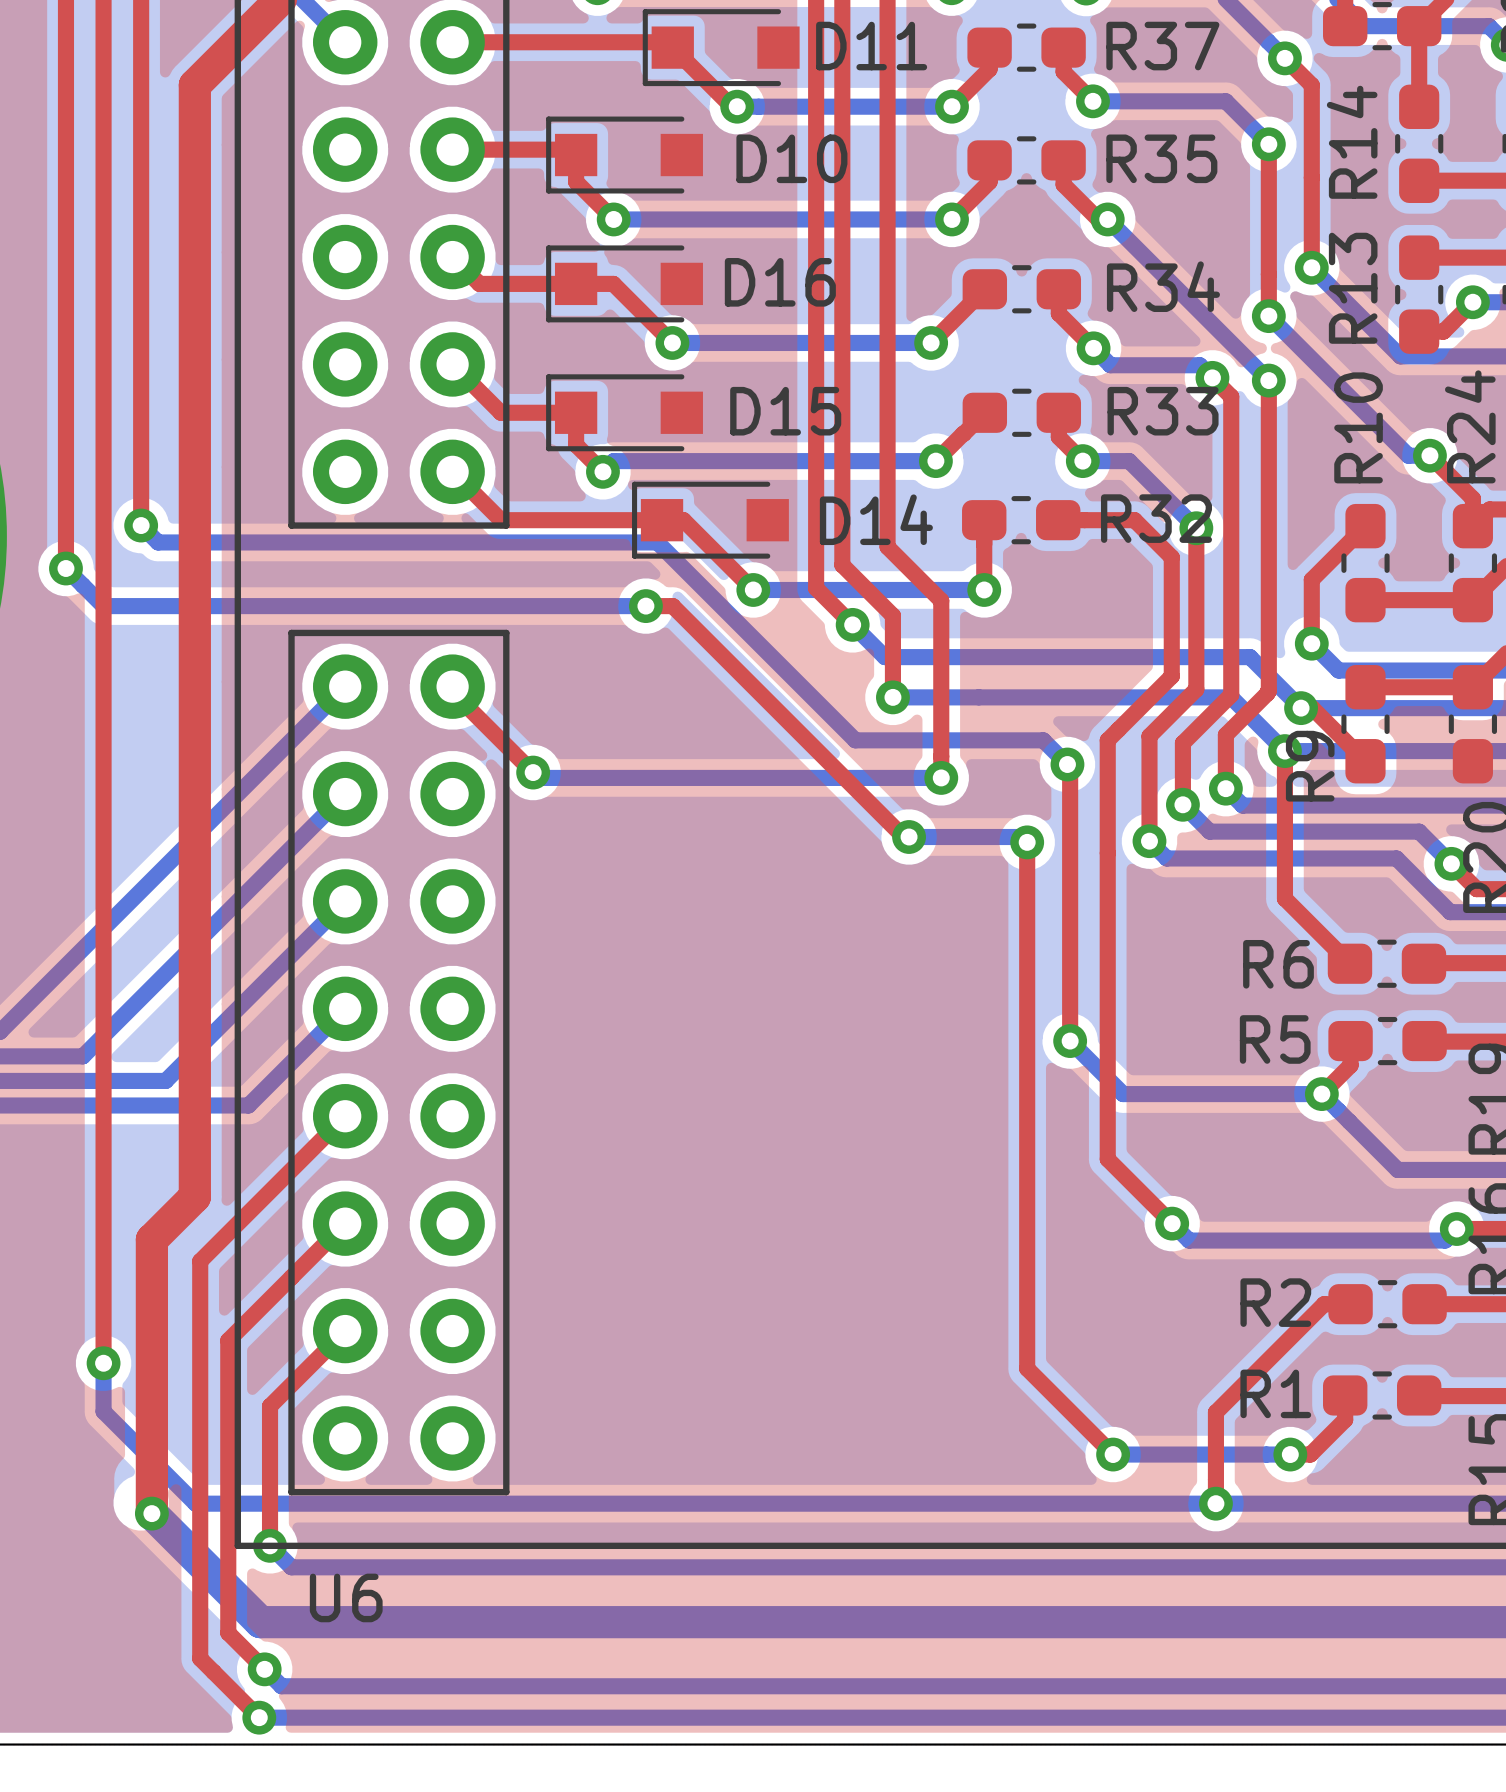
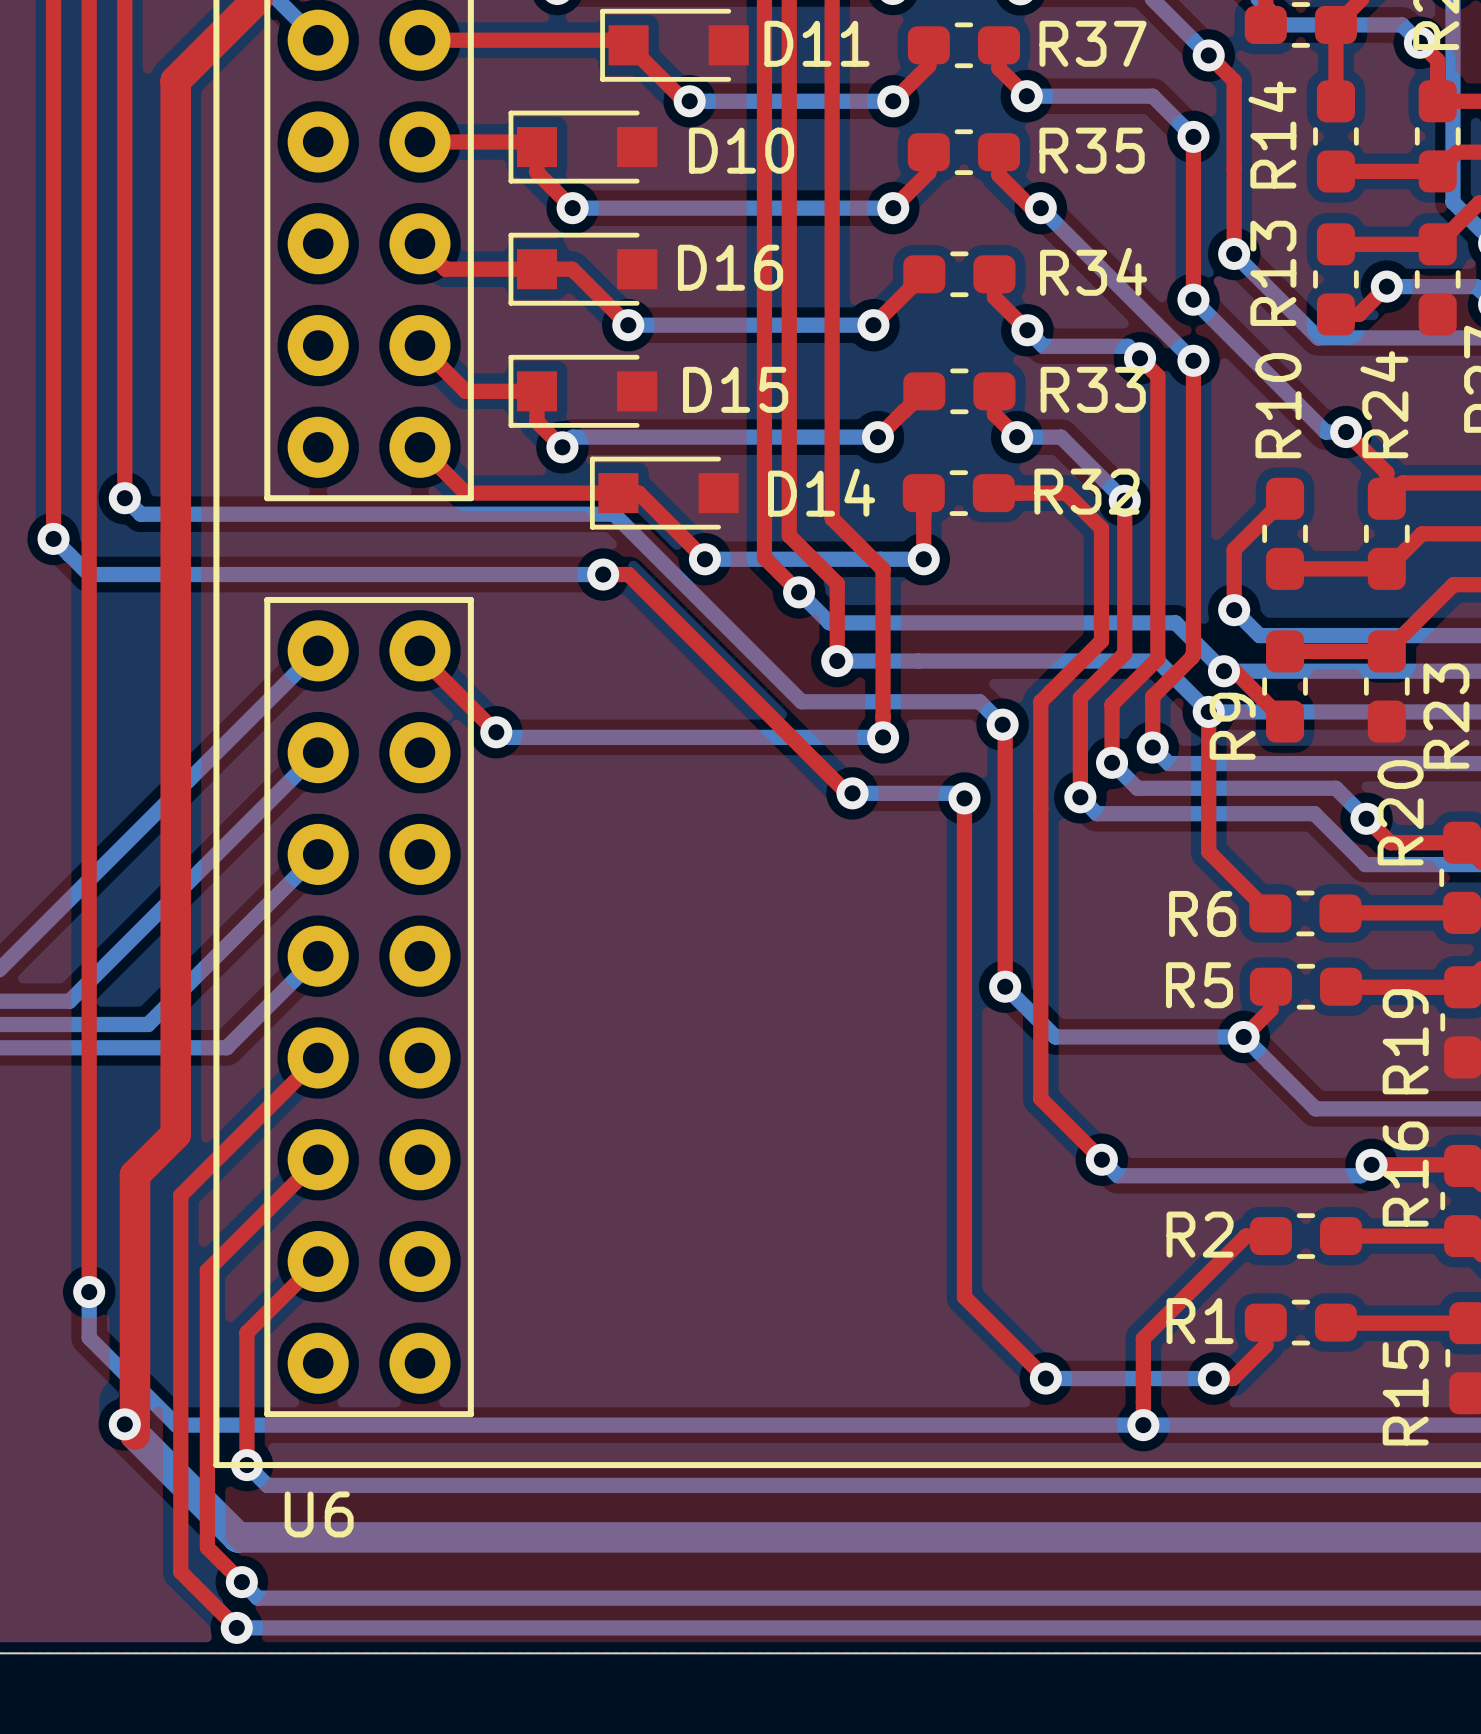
via position: (151, 1513) -> (124, 1424)

